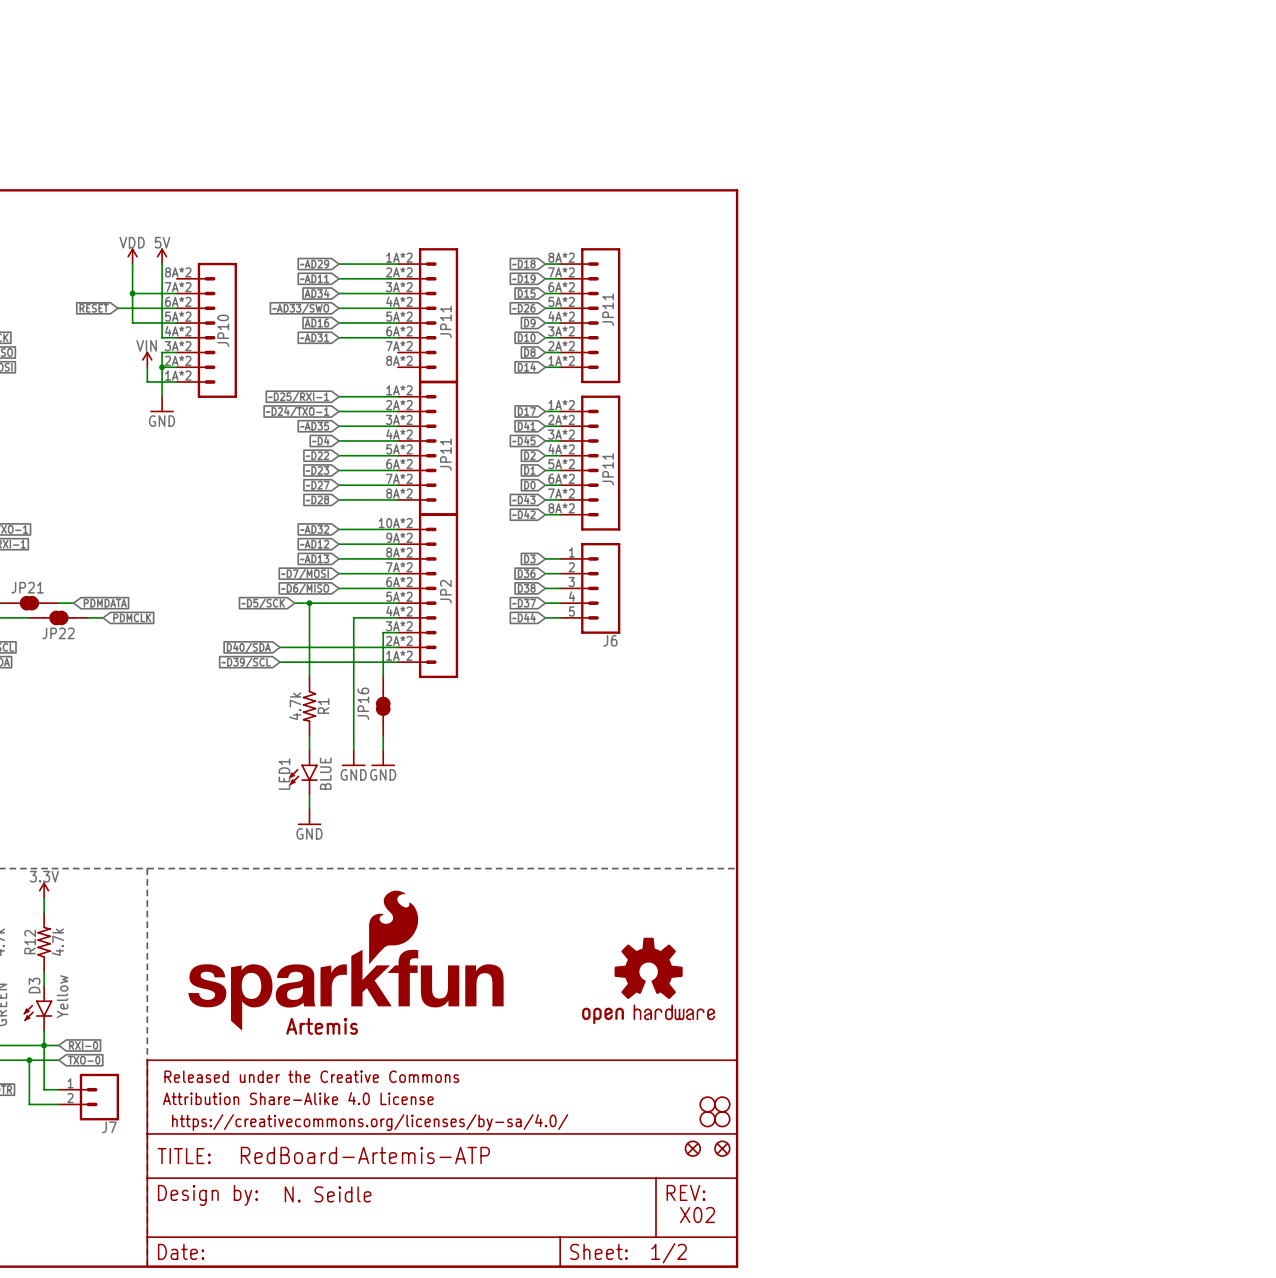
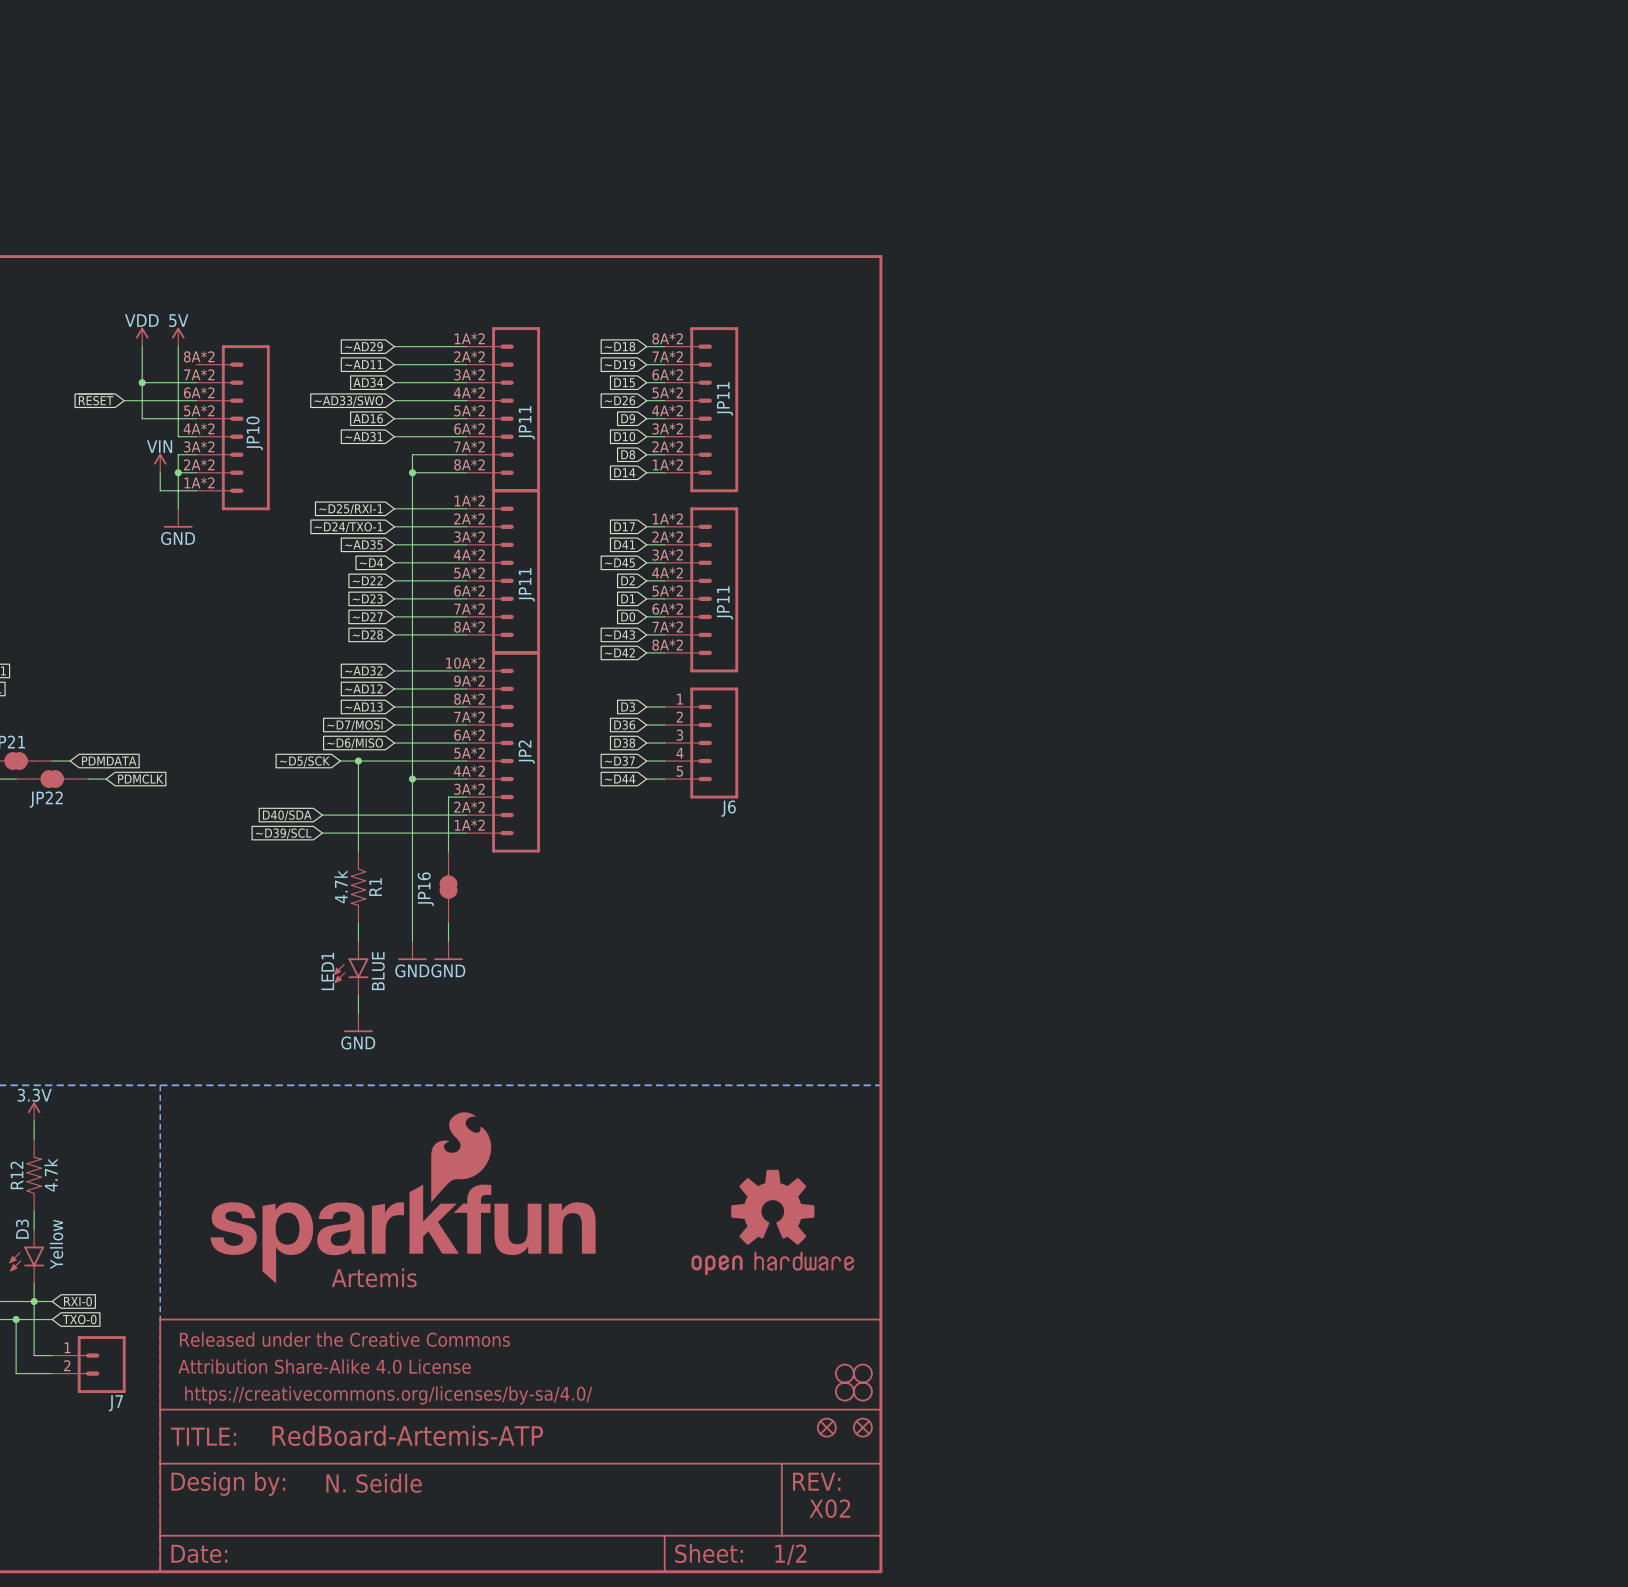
wire: none -> (466, 454) (412, 454) (412, 779)
wire: none -> (412, 472) (466, 472)
junction: none -> (412, 472)
junction: none -> (412, 779)

